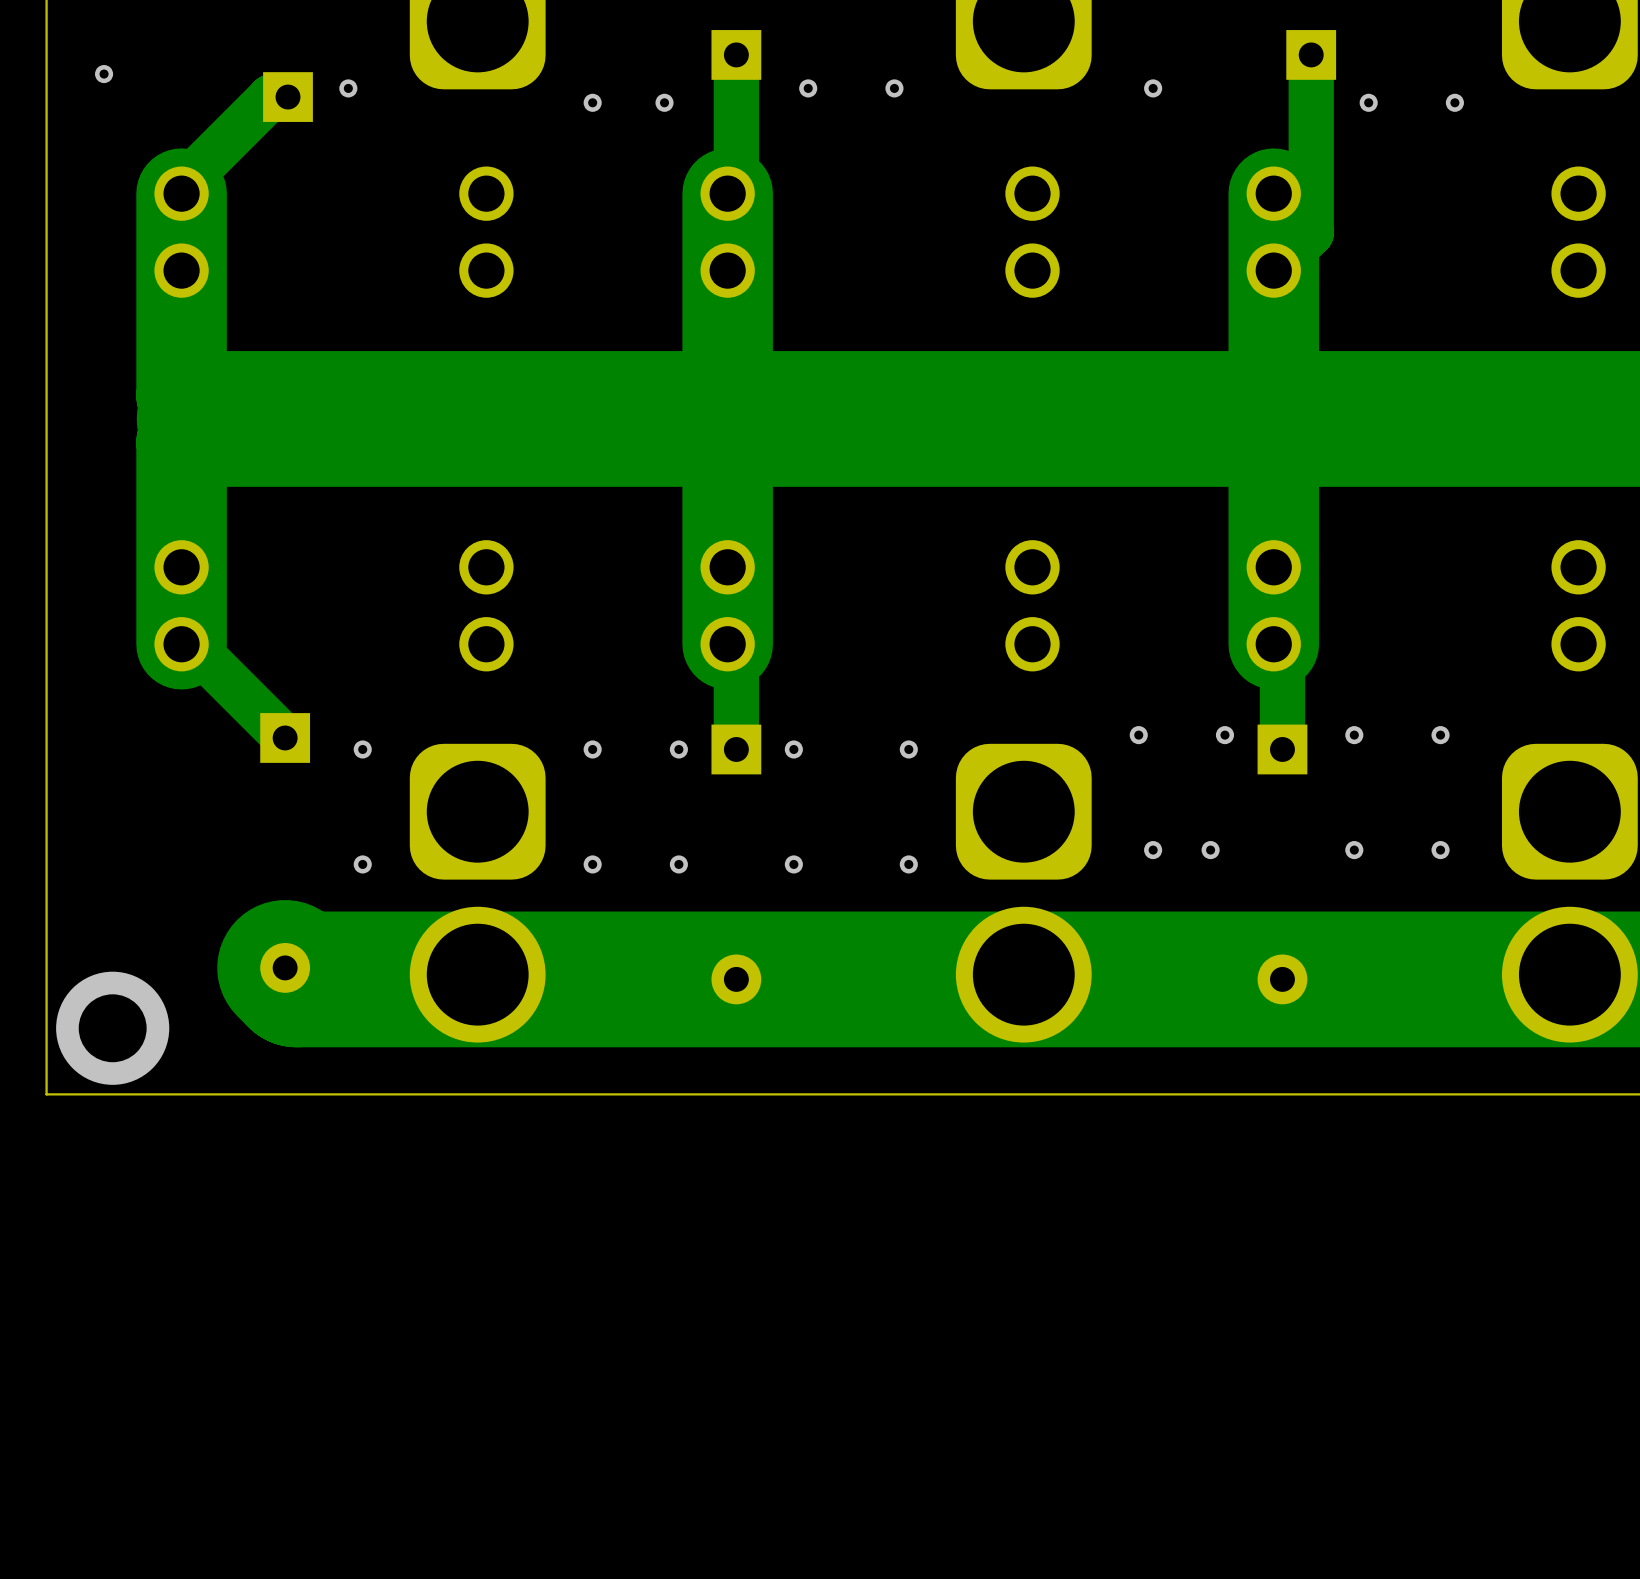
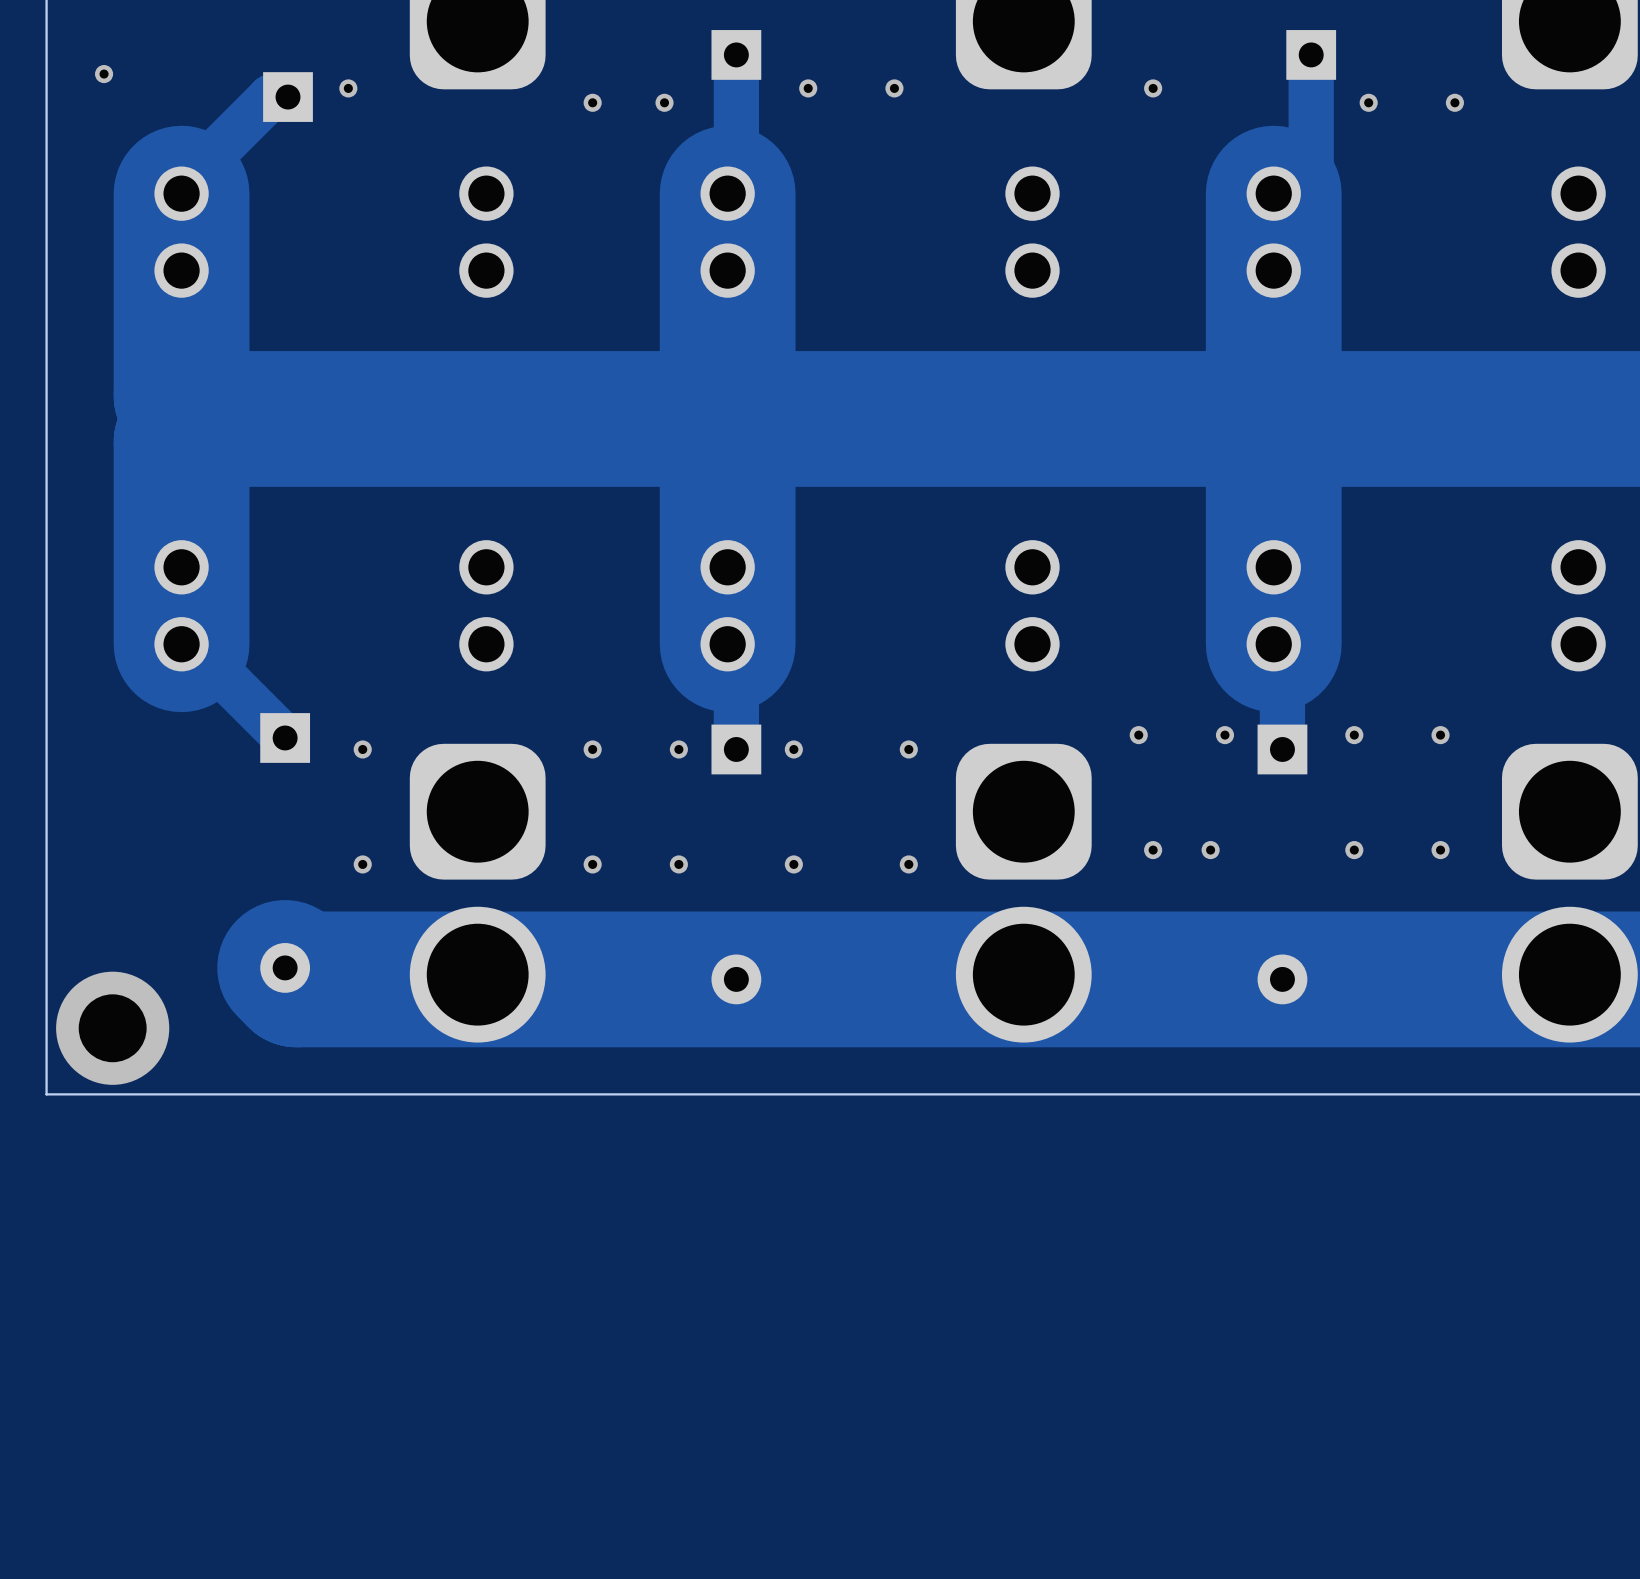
track width: thin (181, 193) (181, 395) (204, 418) (181, 442) (181, 644) -> thick (181, 193) (181, 395) (204, 418) (181, 442) (181, 644)
track width: thin (727, 193) (727, 410) (736, 418) (727, 427) (727, 644) -> thick (727, 193) (727, 410) (736, 418) (727, 427) (727, 644)
track width: thin (1273, 193) (1273, 413) (1268, 418) (1273, 424) (1273, 644) -> thick (1273, 193) (1273, 413) (1268, 418) (1273, 424) (1273, 644)

